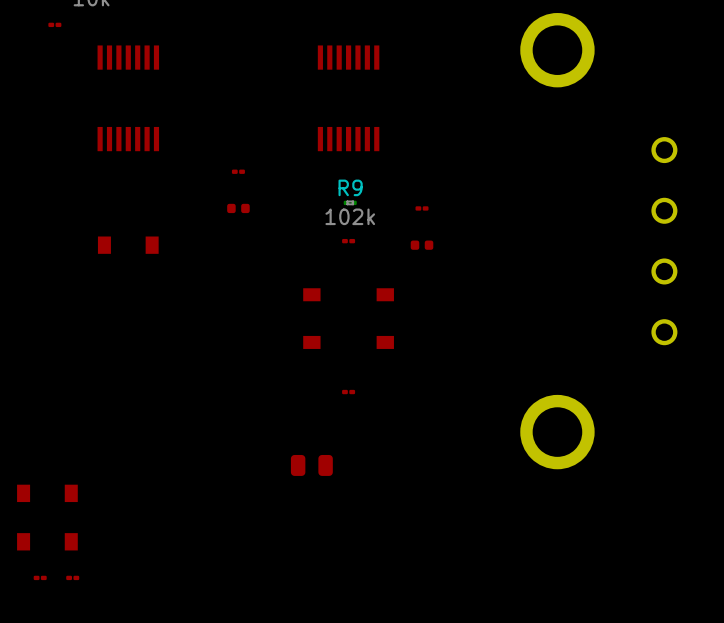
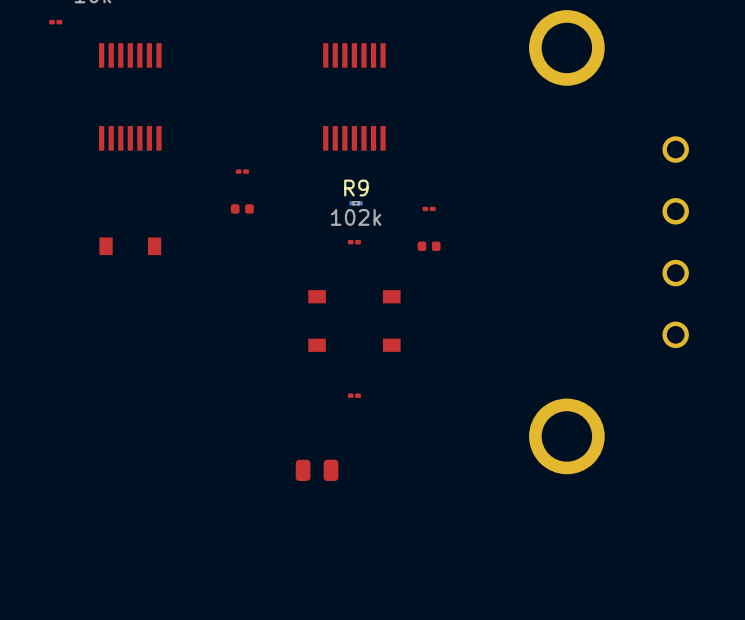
part: (47, 493) -> none
part: (47, 541) -> none
part: (40, 577) -> none
part: (72, 577) -> none

